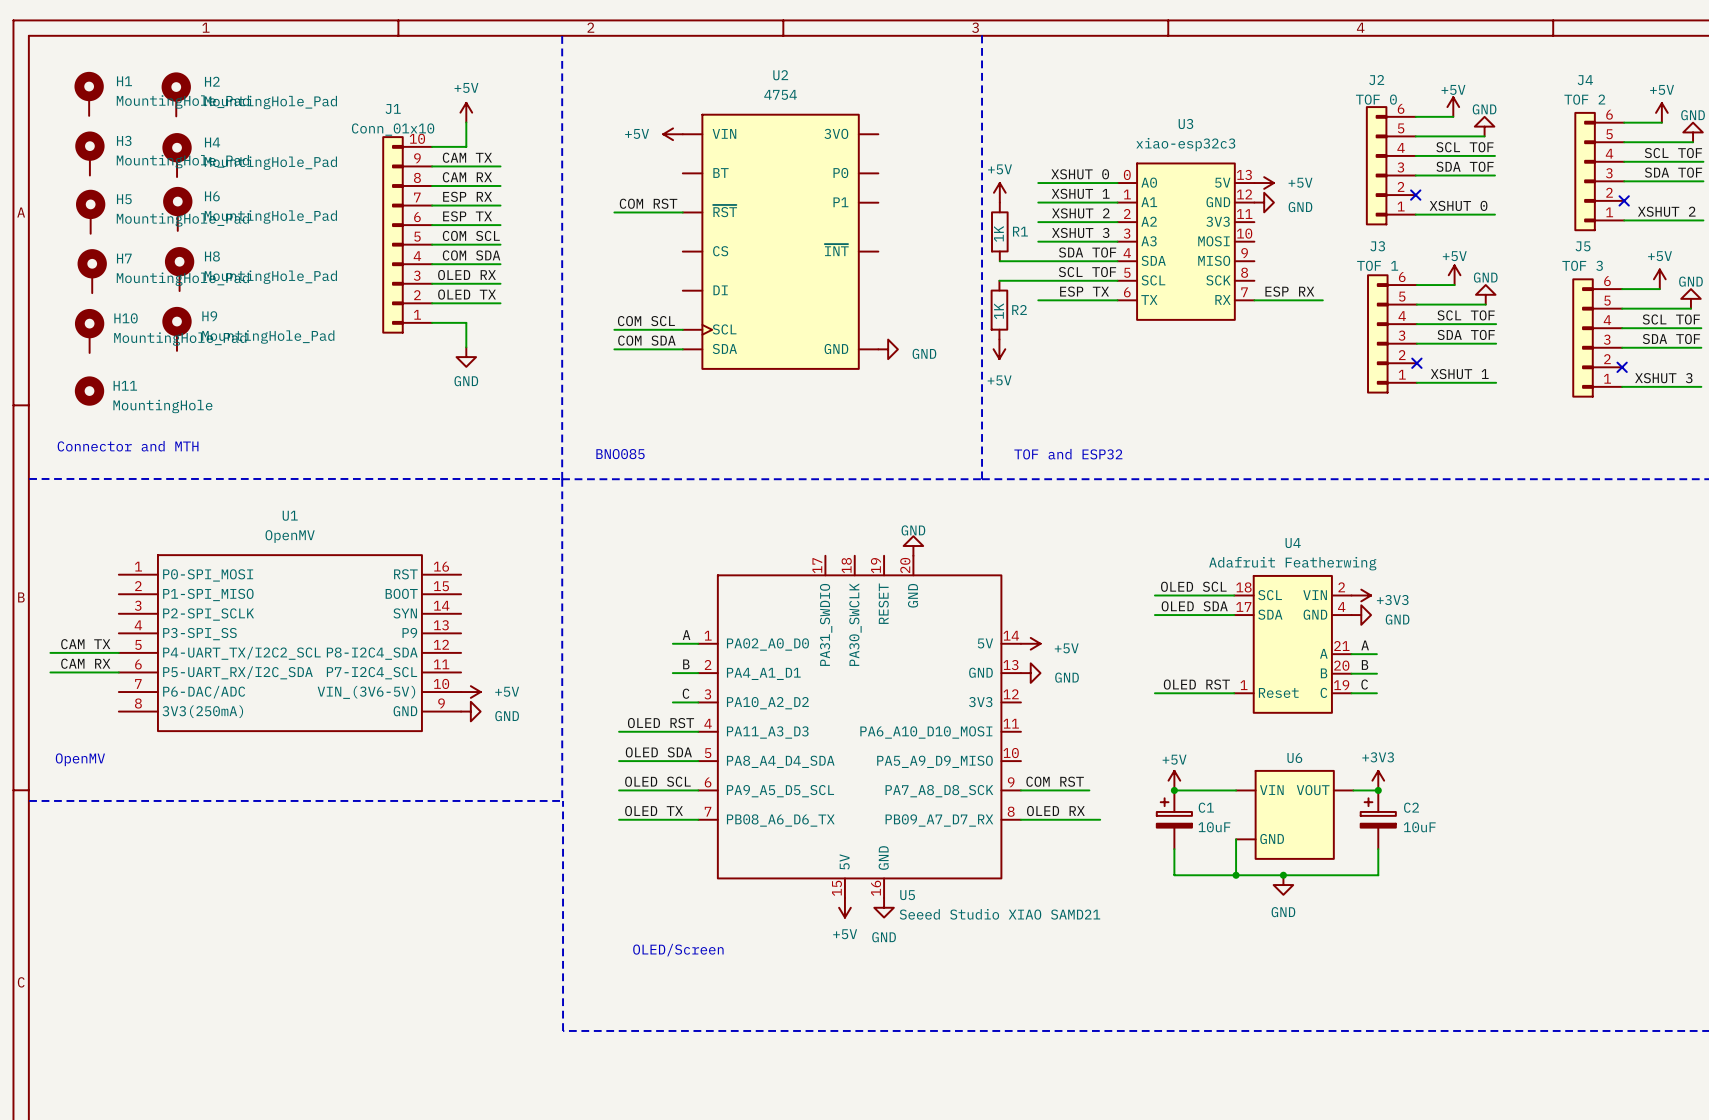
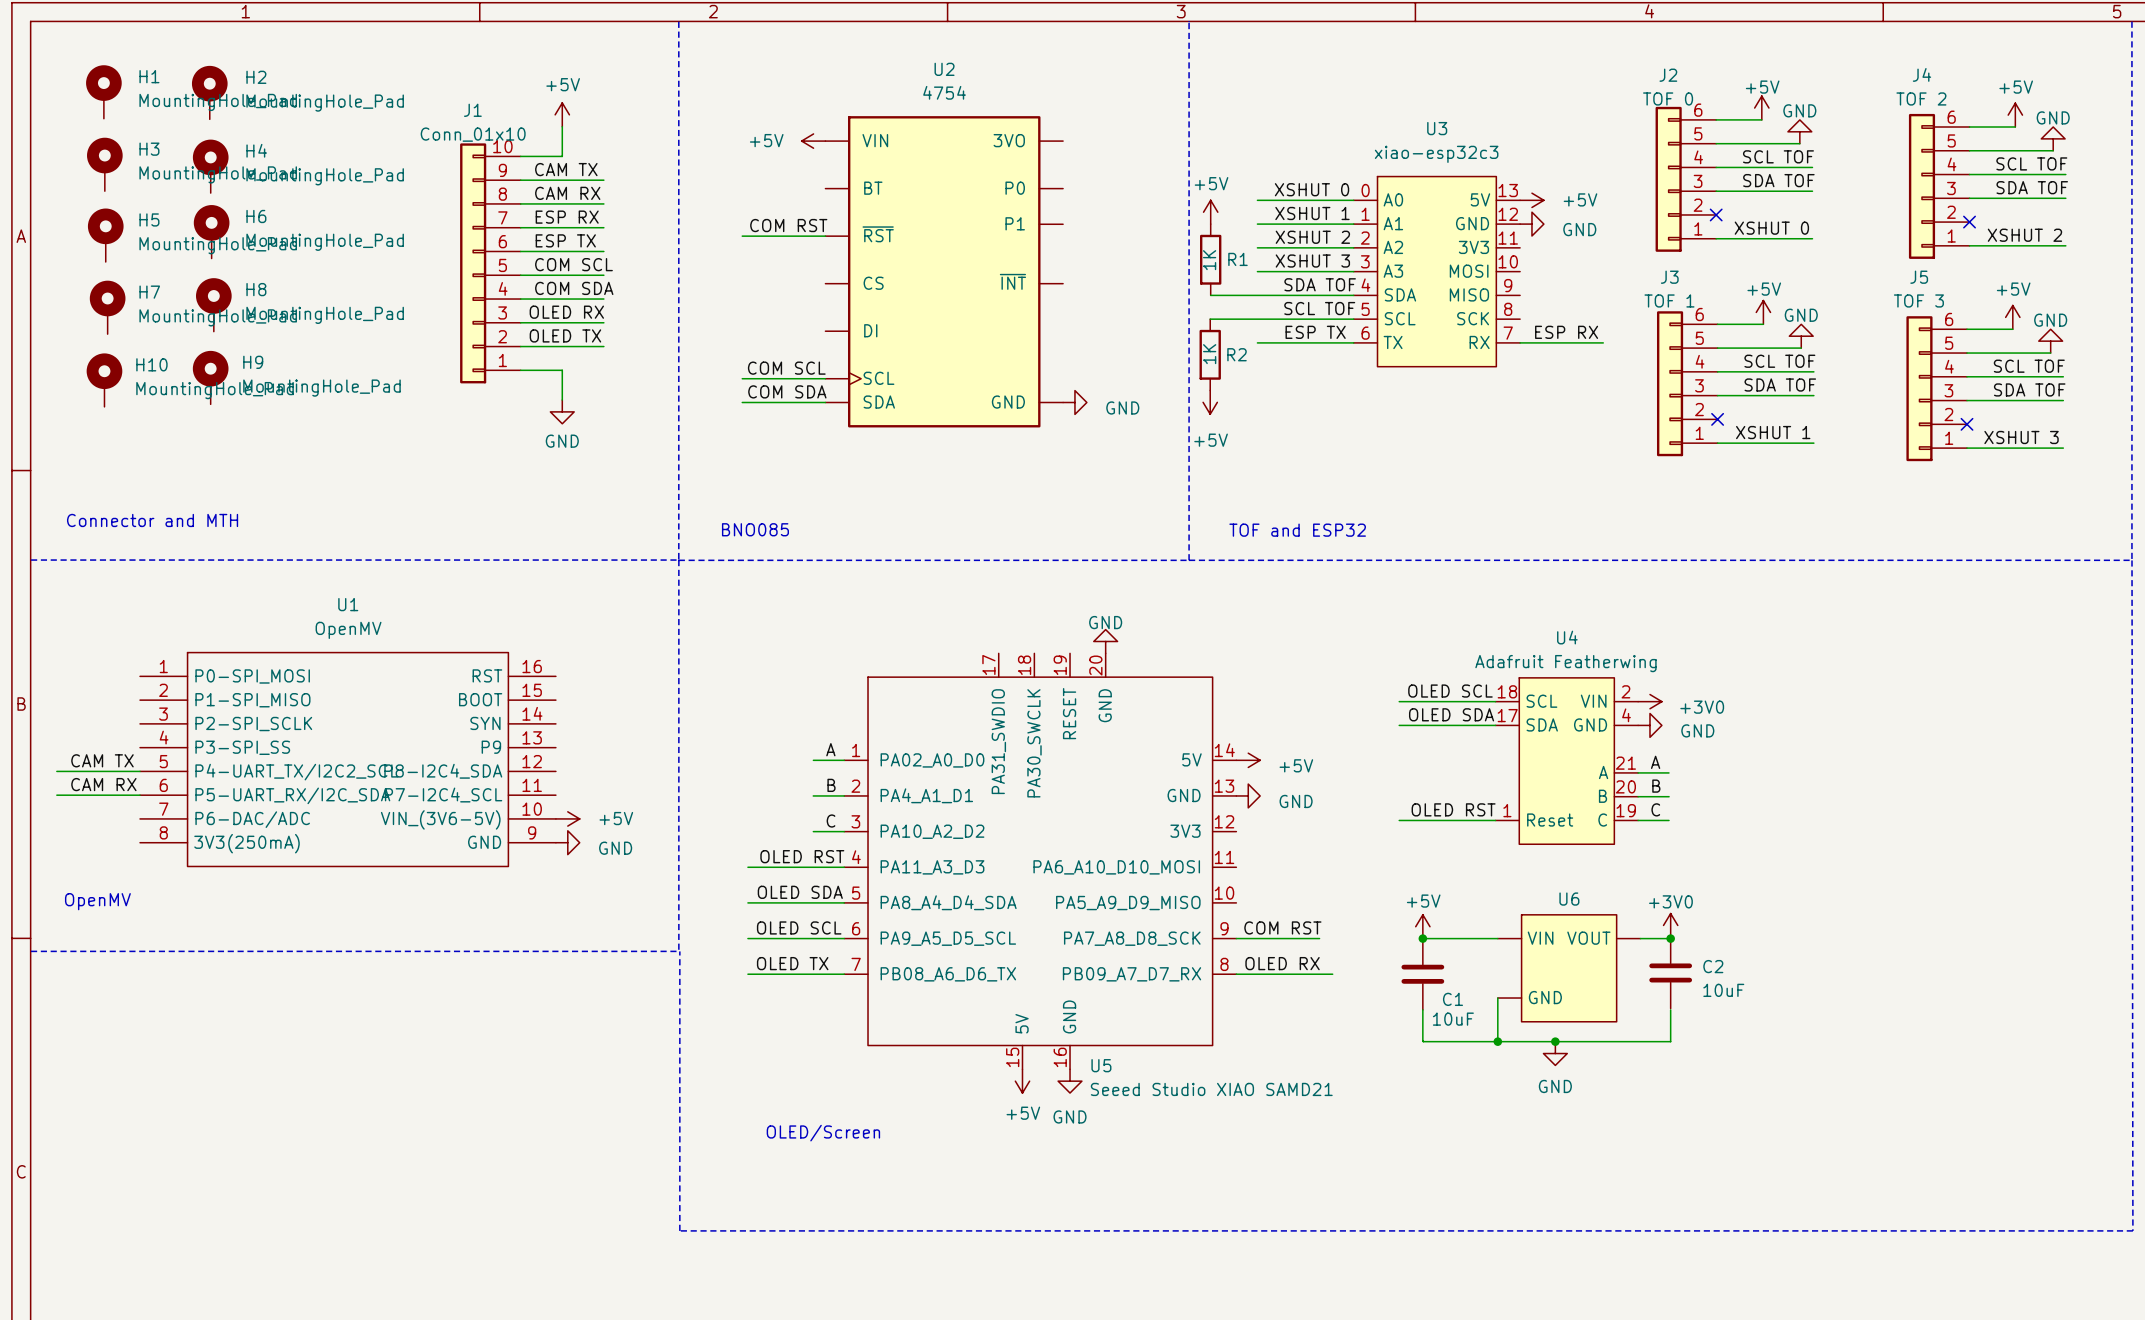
H11: MountingHole (89, 391) -> none
power symbol: +3V3 (1361, 595) -> +3V0 (1649, 701)
power symbol: +3V3 (1378, 780) -> +3V0 (1670, 925)
C1 symbol: [1156, 790, 1192, 850] -> [1401, 938, 1445, 1010]
C2 symbol: [1360, 790, 1396, 850] -> [1649, 937, 1693, 1009]
C1 name position: C1 (1206, 807) -> C1 (1452, 999)
C1 value position: 10uF (1214, 827) -> 10uF (1453, 1019)

